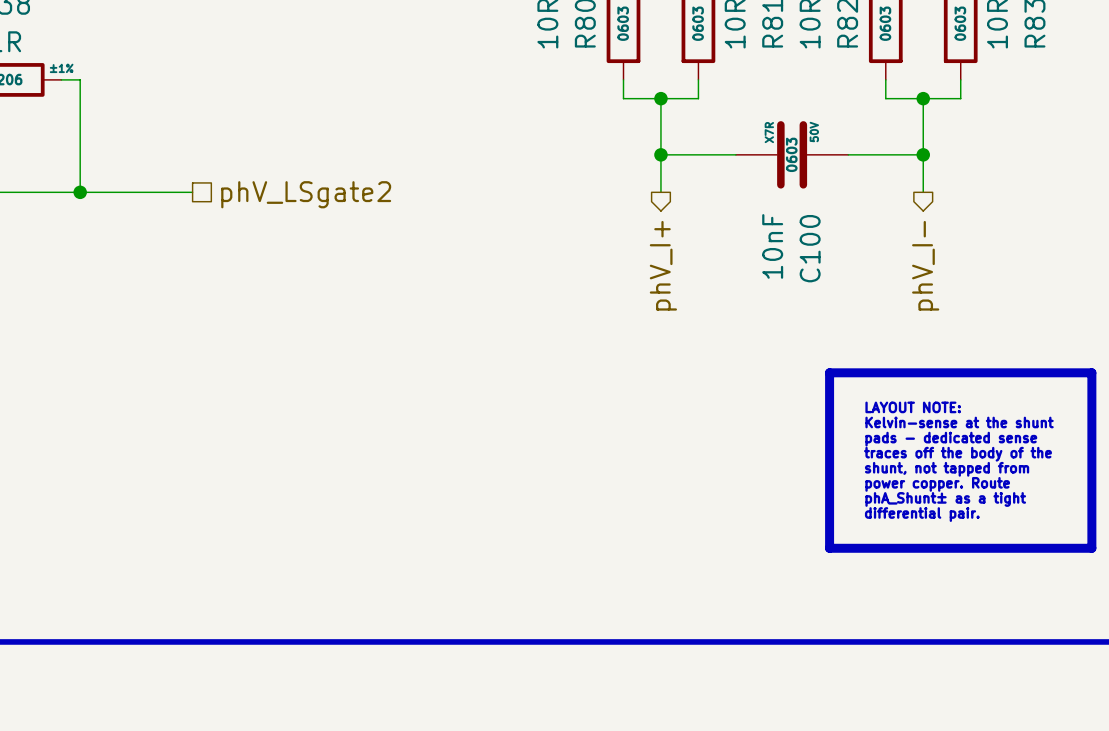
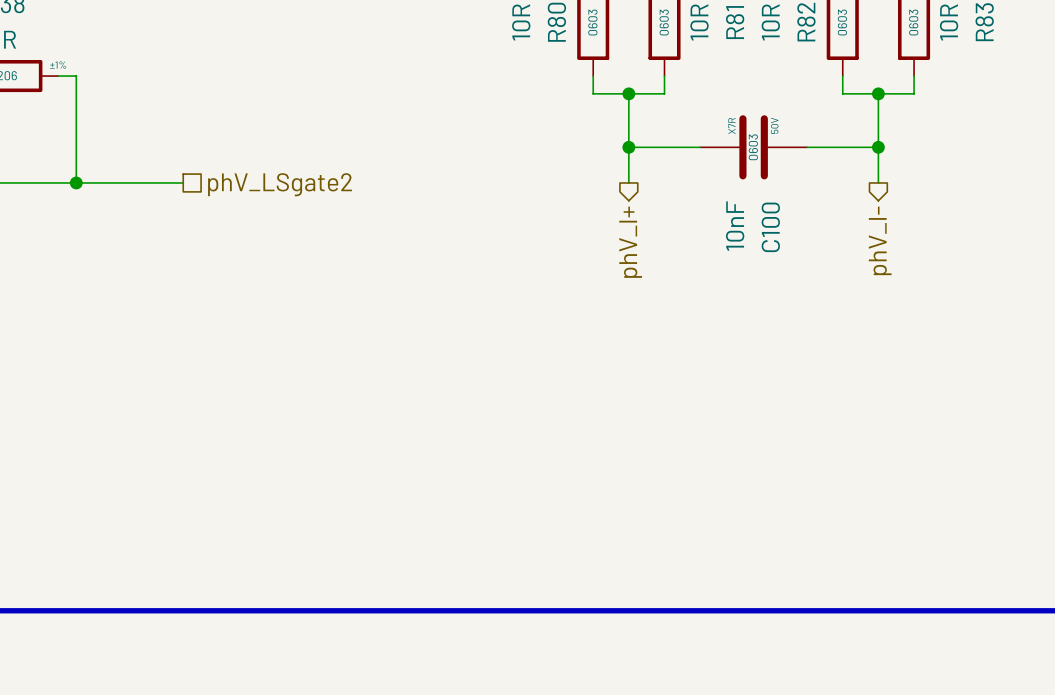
line: (829, 372) (1091, 372) (1091, 548) (829, 548) (829, 372) -> none
text: LAYOUT NOTE: (913, 407) -> none
text: Kelvin-sense at the shunt (959, 422) -> none
text: pads - dedicated sense (951, 439) -> none
text: traces off the body of the (957, 454) -> none
text: shunt, not tapped from (947, 469) -> none
text: power copper. Route (937, 484) -> none
text: phA_Shunt± as a tight (945, 499) -> none
text: differential pair. (922, 514) -> none

